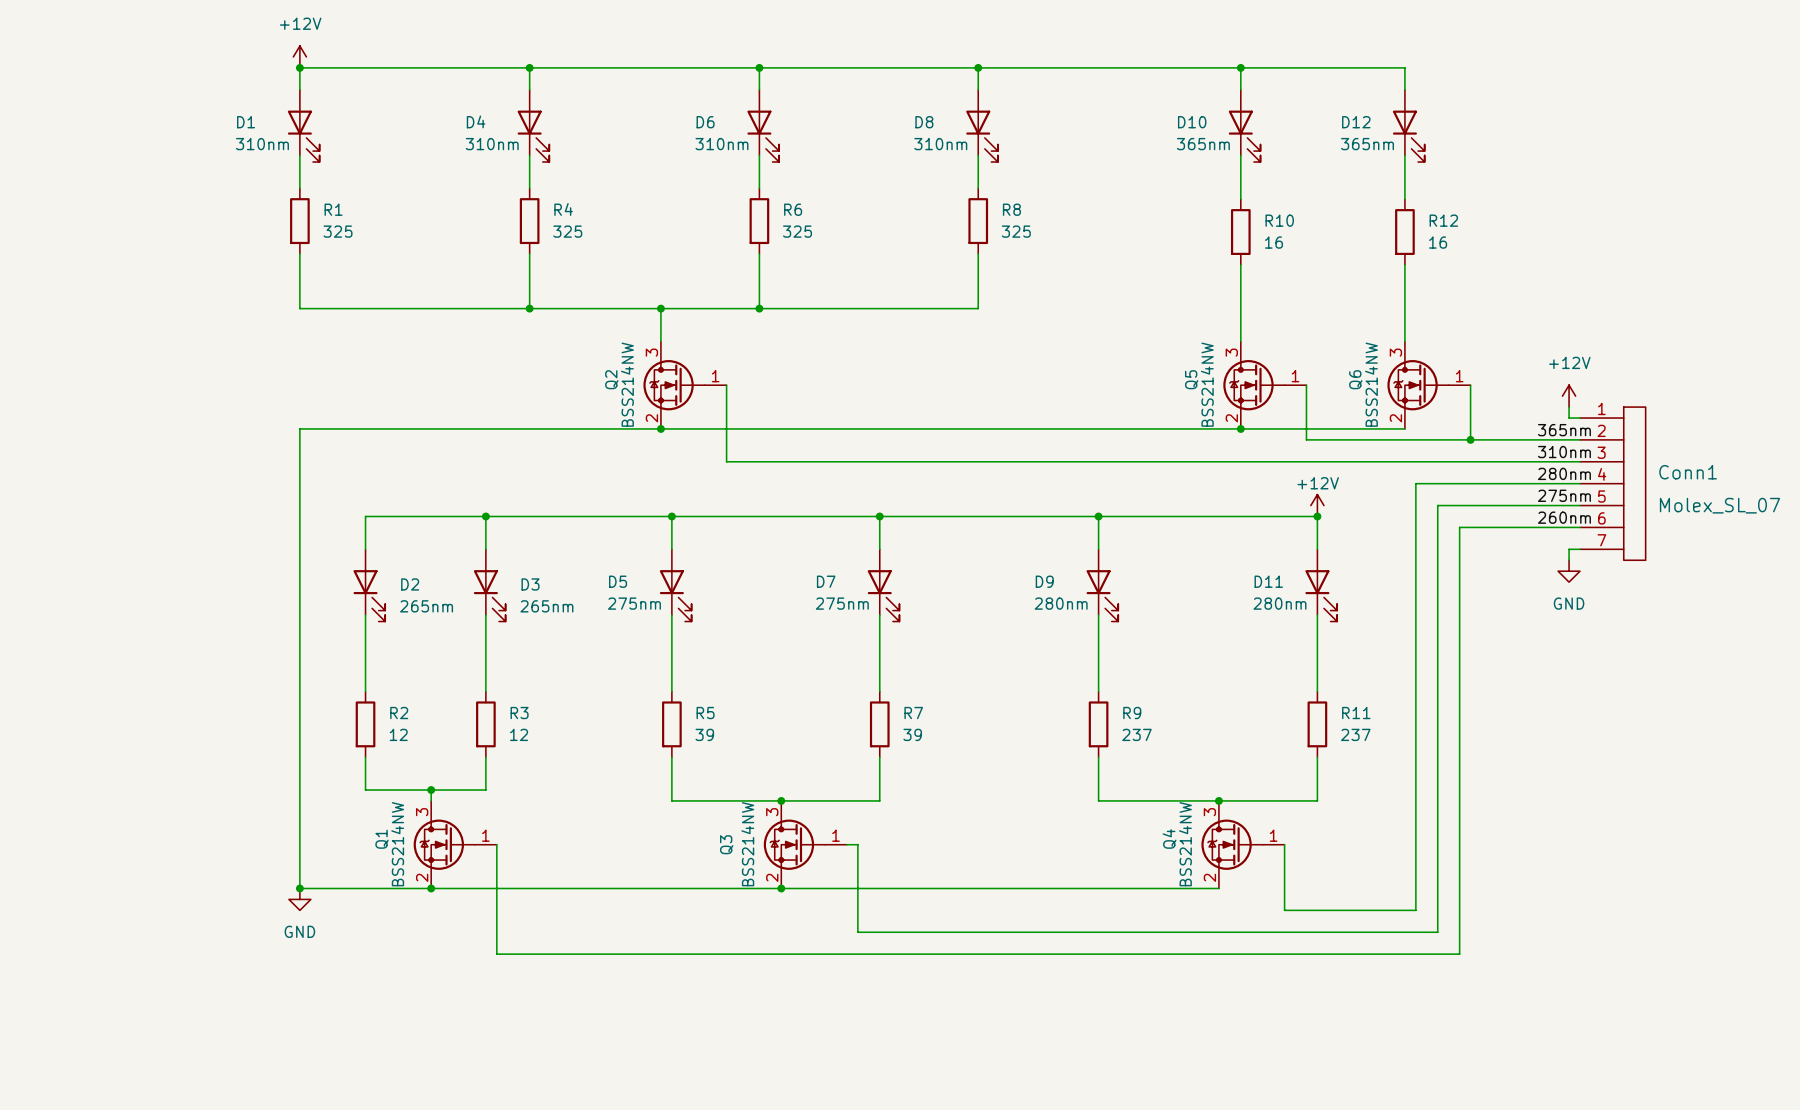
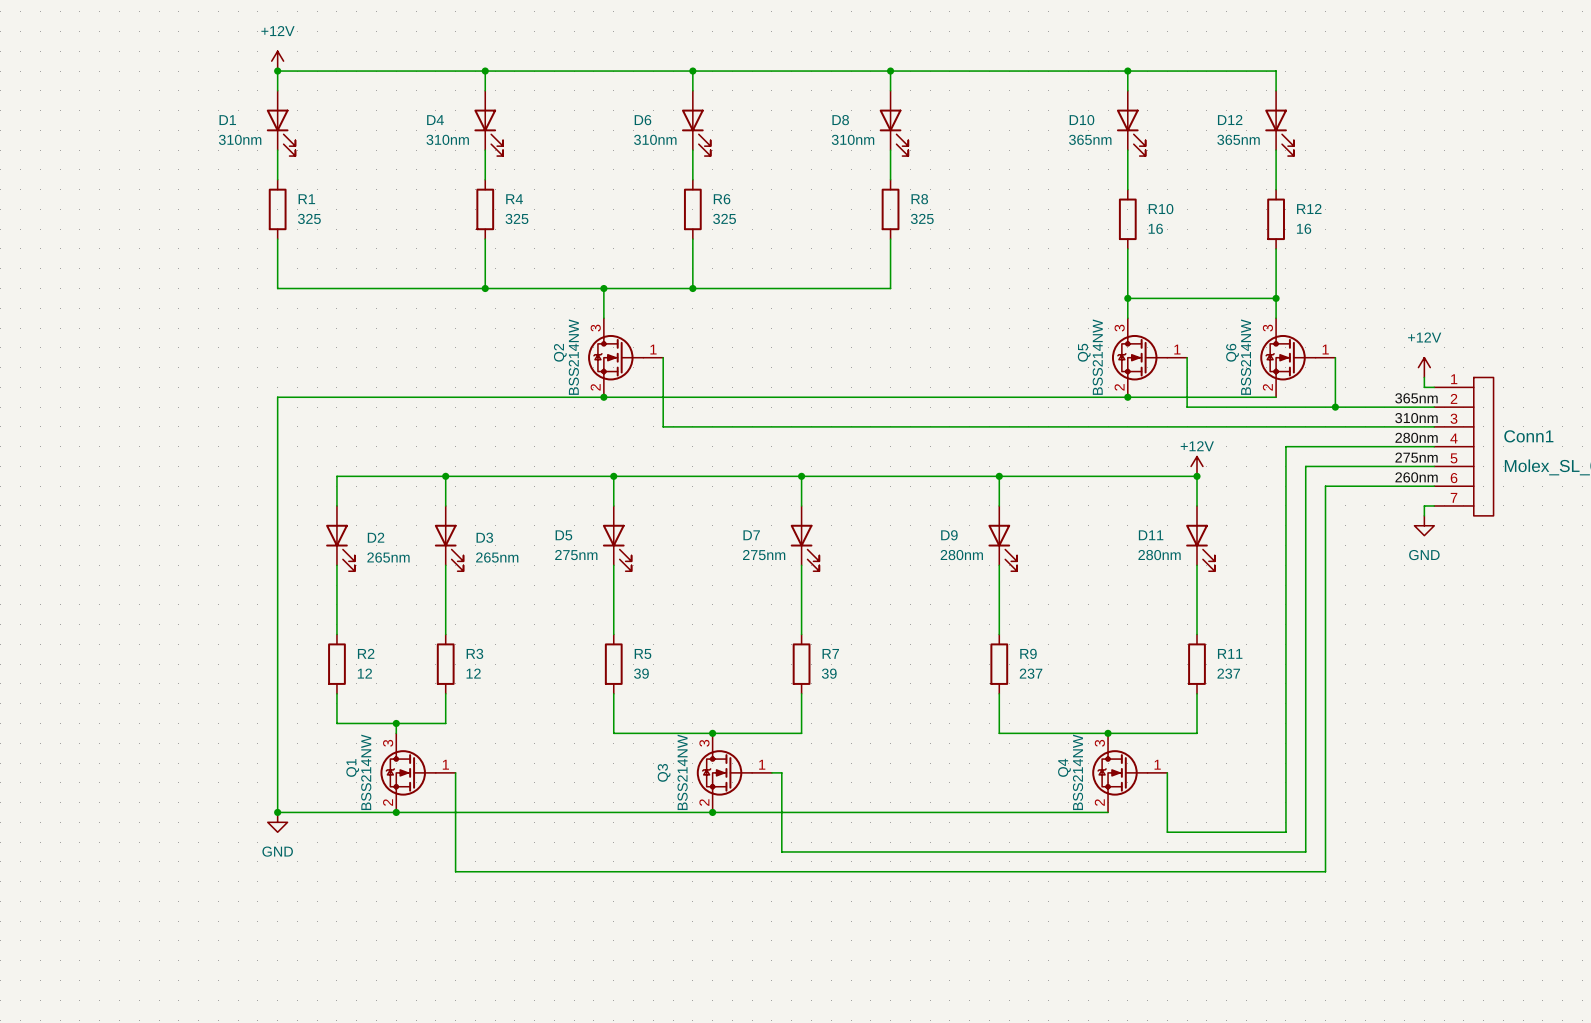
wire: none -> (1127, 298) (1276, 298)
junction: none -> (1127, 298)
junction: none -> (1276, 298)

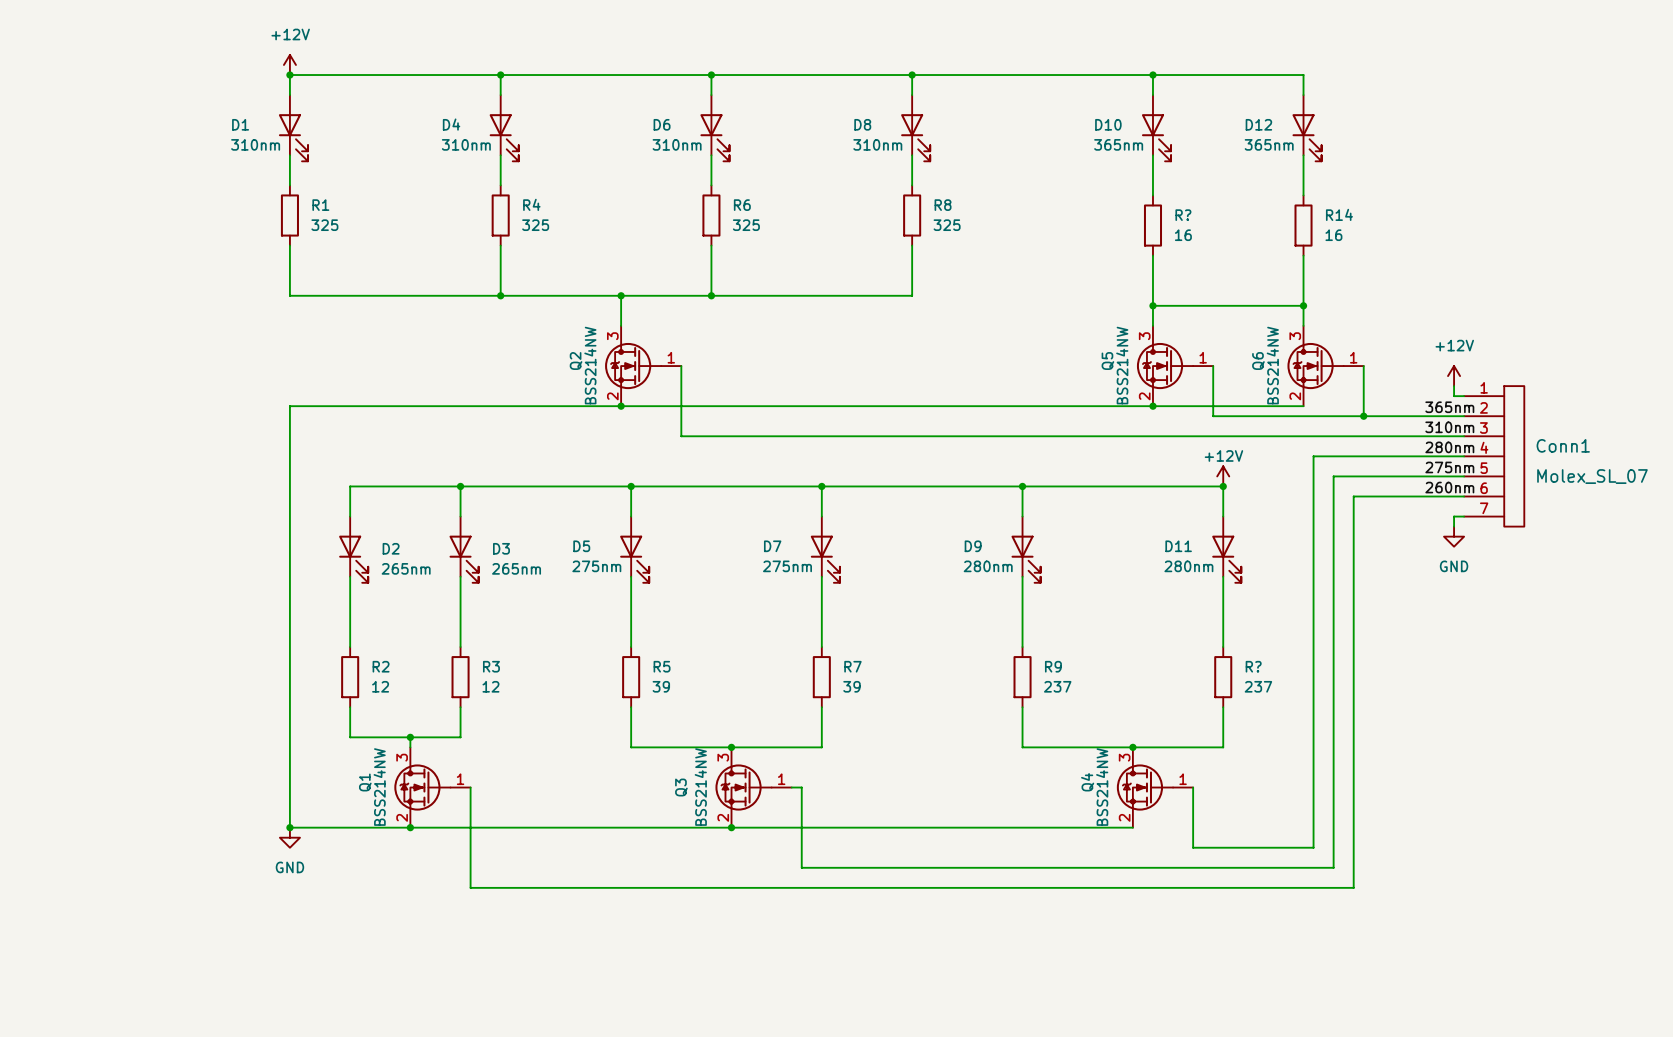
R12 name: R12 (1309, 208) -> R14 (1339, 214)
R10 name: R10 (1161, 209) -> R? (1183, 215)
R11 name: R11 (1230, 653) -> R? (1253, 666)

